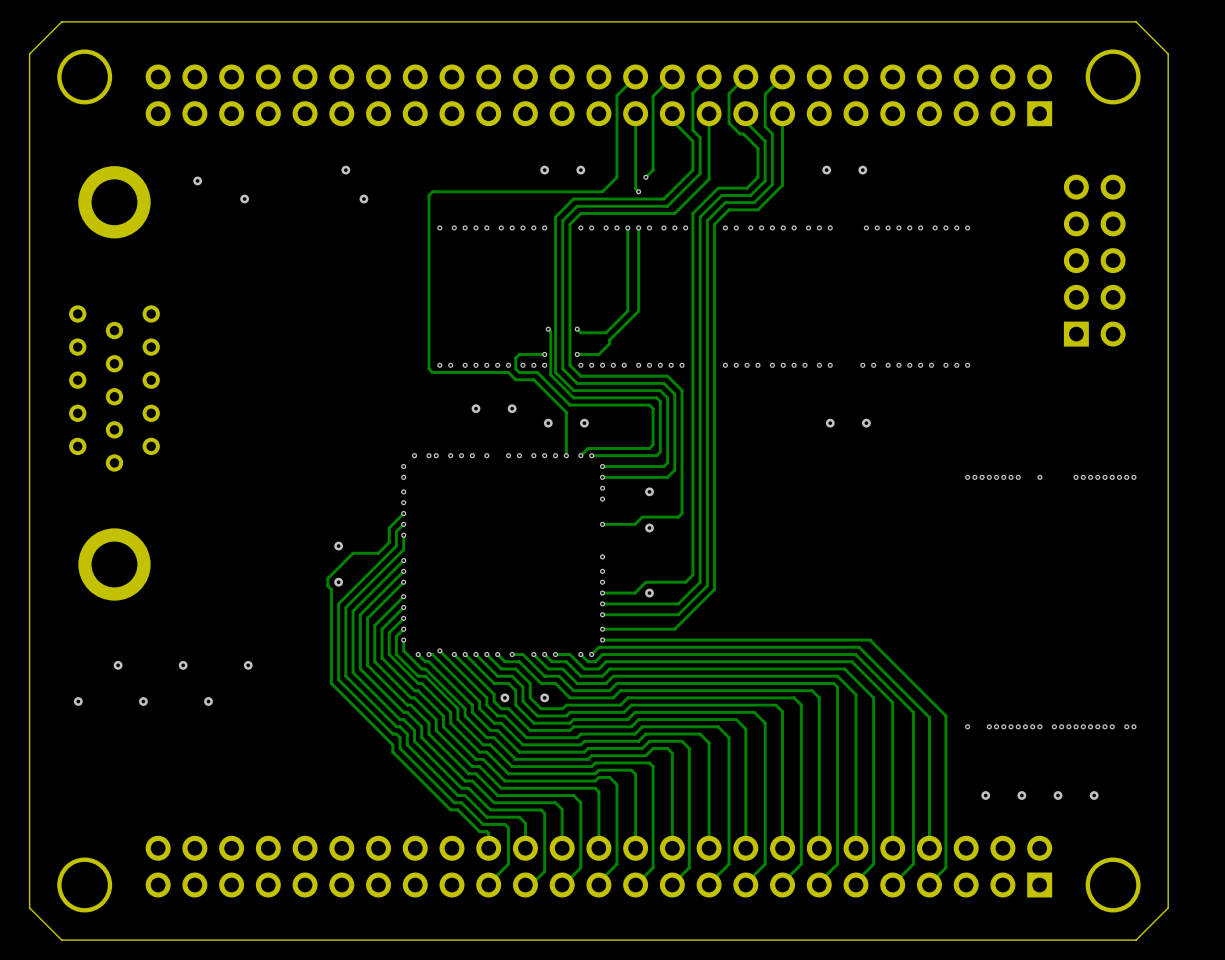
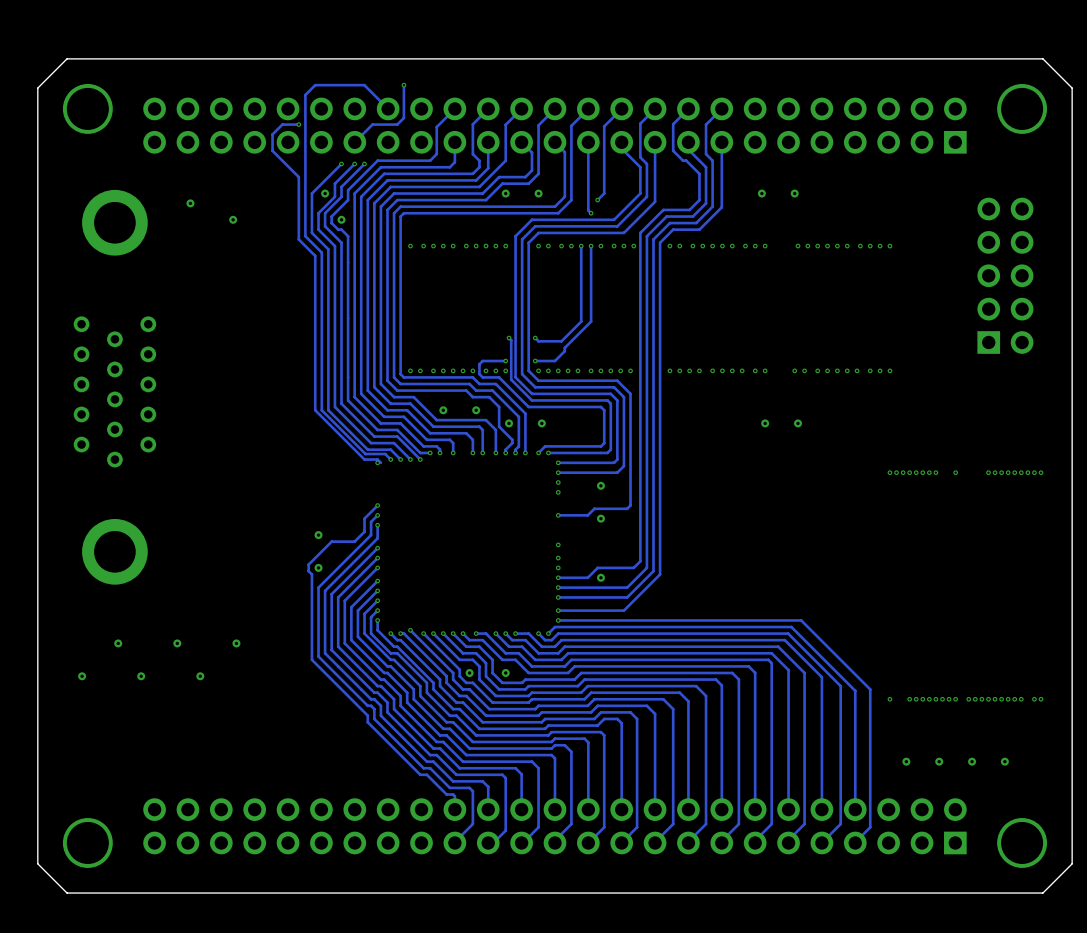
track: none -> (403, 85) (403, 118) (397, 124) (372, 124) (354, 142)
via: none -> (403, 85)
track: none -> (388, 108) (364, 85) (315, 85) (305, 95) (305, 236) (321, 252) (321, 410) (365, 454) (385, 454) (390, 459)
track: none -> (454, 108) (436, 127) (436, 154) (430, 160) (377, 160) (348, 190) (348, 200) (331, 216) (331, 223) (348, 236) (348, 400) (377, 429) (397, 429) (420, 452) (430, 452)
track: none -> (488, 108) (472, 124) (472, 154) (479, 160) (479, 167) (472, 173) (384, 173) (361, 196) (361, 393) (384, 416) (403, 416) (426, 439) (449, 439) (453, 443) (453, 452)
track: none -> (521, 108) (505, 124) (505, 160) (479, 186) (390, 186) (374, 203) (374, 387) (390, 403) (410, 403) (433, 426) (479, 426) (482, 429) (482, 452)
track: none -> (554, 108) (538, 125) (538, 173) (528, 183) (502, 183) (486, 200) (397, 200) (387, 209) (387, 380) (397, 390) (466, 390) (472, 397) (489, 397) (499, 406) (499, 426) (512, 439) (505, 452)
track: none -> (298, 124) (282, 124) (272, 134) (272, 150) (298, 177) (298, 239) (315, 255) (315, 410) (364, 459) (377, 459) (380, 462)
via: none -> (298, 124)
track: none -> (454, 142) (454, 162) (449, 167) (380, 167) (354, 193) (354, 397) (380, 423) (400, 423) (423, 446) (436, 446) (440, 452)
track: none -> (488, 142) (488, 168) (476, 180) (387, 180) (367, 200) (367, 390) (387, 410) (407, 410) (430, 433) (466, 433) (472, 439) (472, 452)
track: none -> (521, 142) (531, 152) (531, 170) (525, 177) (499, 177) (482, 193) (394, 193) (380, 206) (380, 384) (394, 397) (413, 397) (436, 420) (486, 420) (495, 429) (495, 452)
track: none -> (554, 142) (564, 152) (564, 196) (554, 206) (400, 206) (394, 213) (394, 377) (400, 384) (469, 384) (476, 390) (492, 390) (518, 416) (518, 446) (515, 452)
track: none -> (341, 163) (311, 193) (311, 232) (328, 249) (328, 410) (367, 449) (390, 449) (400, 459)
via: none -> (341, 163)
track: none -> (354, 163) (334, 183) (334, 196) (318, 213) (318, 229) (334, 246) (334, 406) (371, 443) (394, 443) (410, 459)
via: none -> (354, 163)
track: none -> (364, 163) (341, 186) (341, 196) (325, 213) (325, 226) (341, 242) (341, 403) (374, 436) (397, 436) (420, 459)
via: none -> (364, 163)
via: (414, 455) -> none
via: (429, 455) -> none
via: (436, 455) -> none
via: (450, 455) -> none
via: none -> (390, 459)
via: none -> (400, 459)
via: none -> (410, 459)
via: none -> (420, 459)
via: (403, 477) -> none
via: (403, 491) -> none
via: (403, 502) -> none

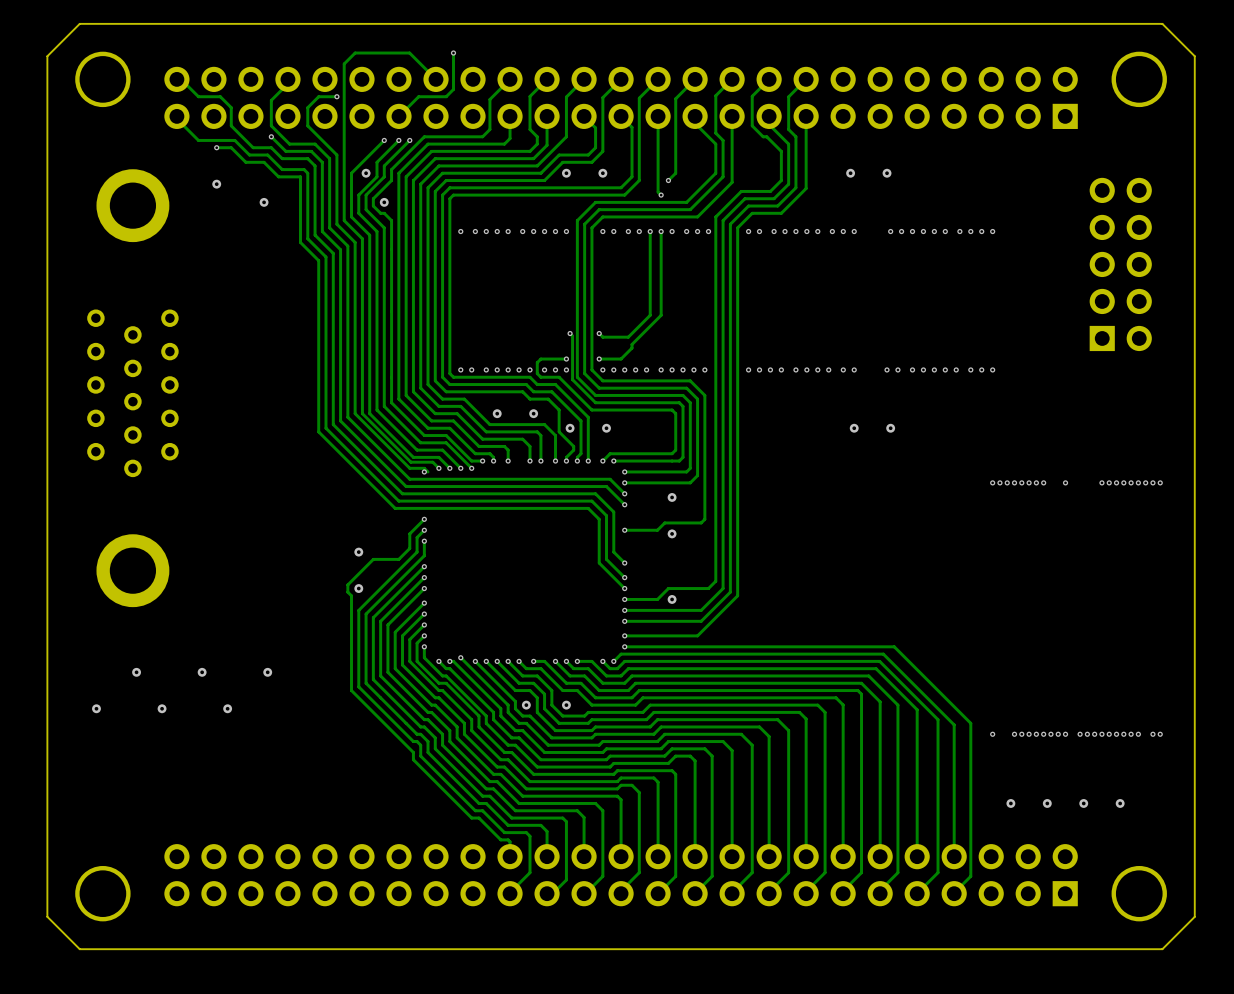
track: none -> (176, 79) (181, 79) (198, 96) (220, 96) (231, 107) (231, 125) (253, 147) (271, 147) (282, 158) (307, 158) (315, 165) (315, 235) (333, 253) (333, 424) (402, 493) (595, 493) (613, 512) (613, 552) (624, 563)
track: none -> (287, 79) (287, 83) (271, 100) (271, 125) (289, 144) (315, 144) (329, 158) (329, 227) (347, 246) (347, 417) (409, 479) (610, 479) (624, 493)
track: none -> (176, 116) (176, 118) (198, 140) (234, 140) (249, 155) (267, 155) (282, 169) (304, 169) (307, 173) (307, 238) (325, 257) (325, 428) (398, 501) (591, 501) (606, 515) (606, 559) (624, 577)
track: none -> (271, 136) (285, 151) (311, 151) (322, 162) (322, 231) (340, 249) (340, 420) (406, 486) (606, 486) (624, 504)
via: none -> (271, 136)
track: none -> (216, 147) (231, 147) (245, 162) (264, 162) (278, 176) (300, 176) (300, 242) (318, 260) (318, 431) (395, 508) (588, 508) (599, 519) (599, 563) (624, 588)
via: none -> (216, 147)

